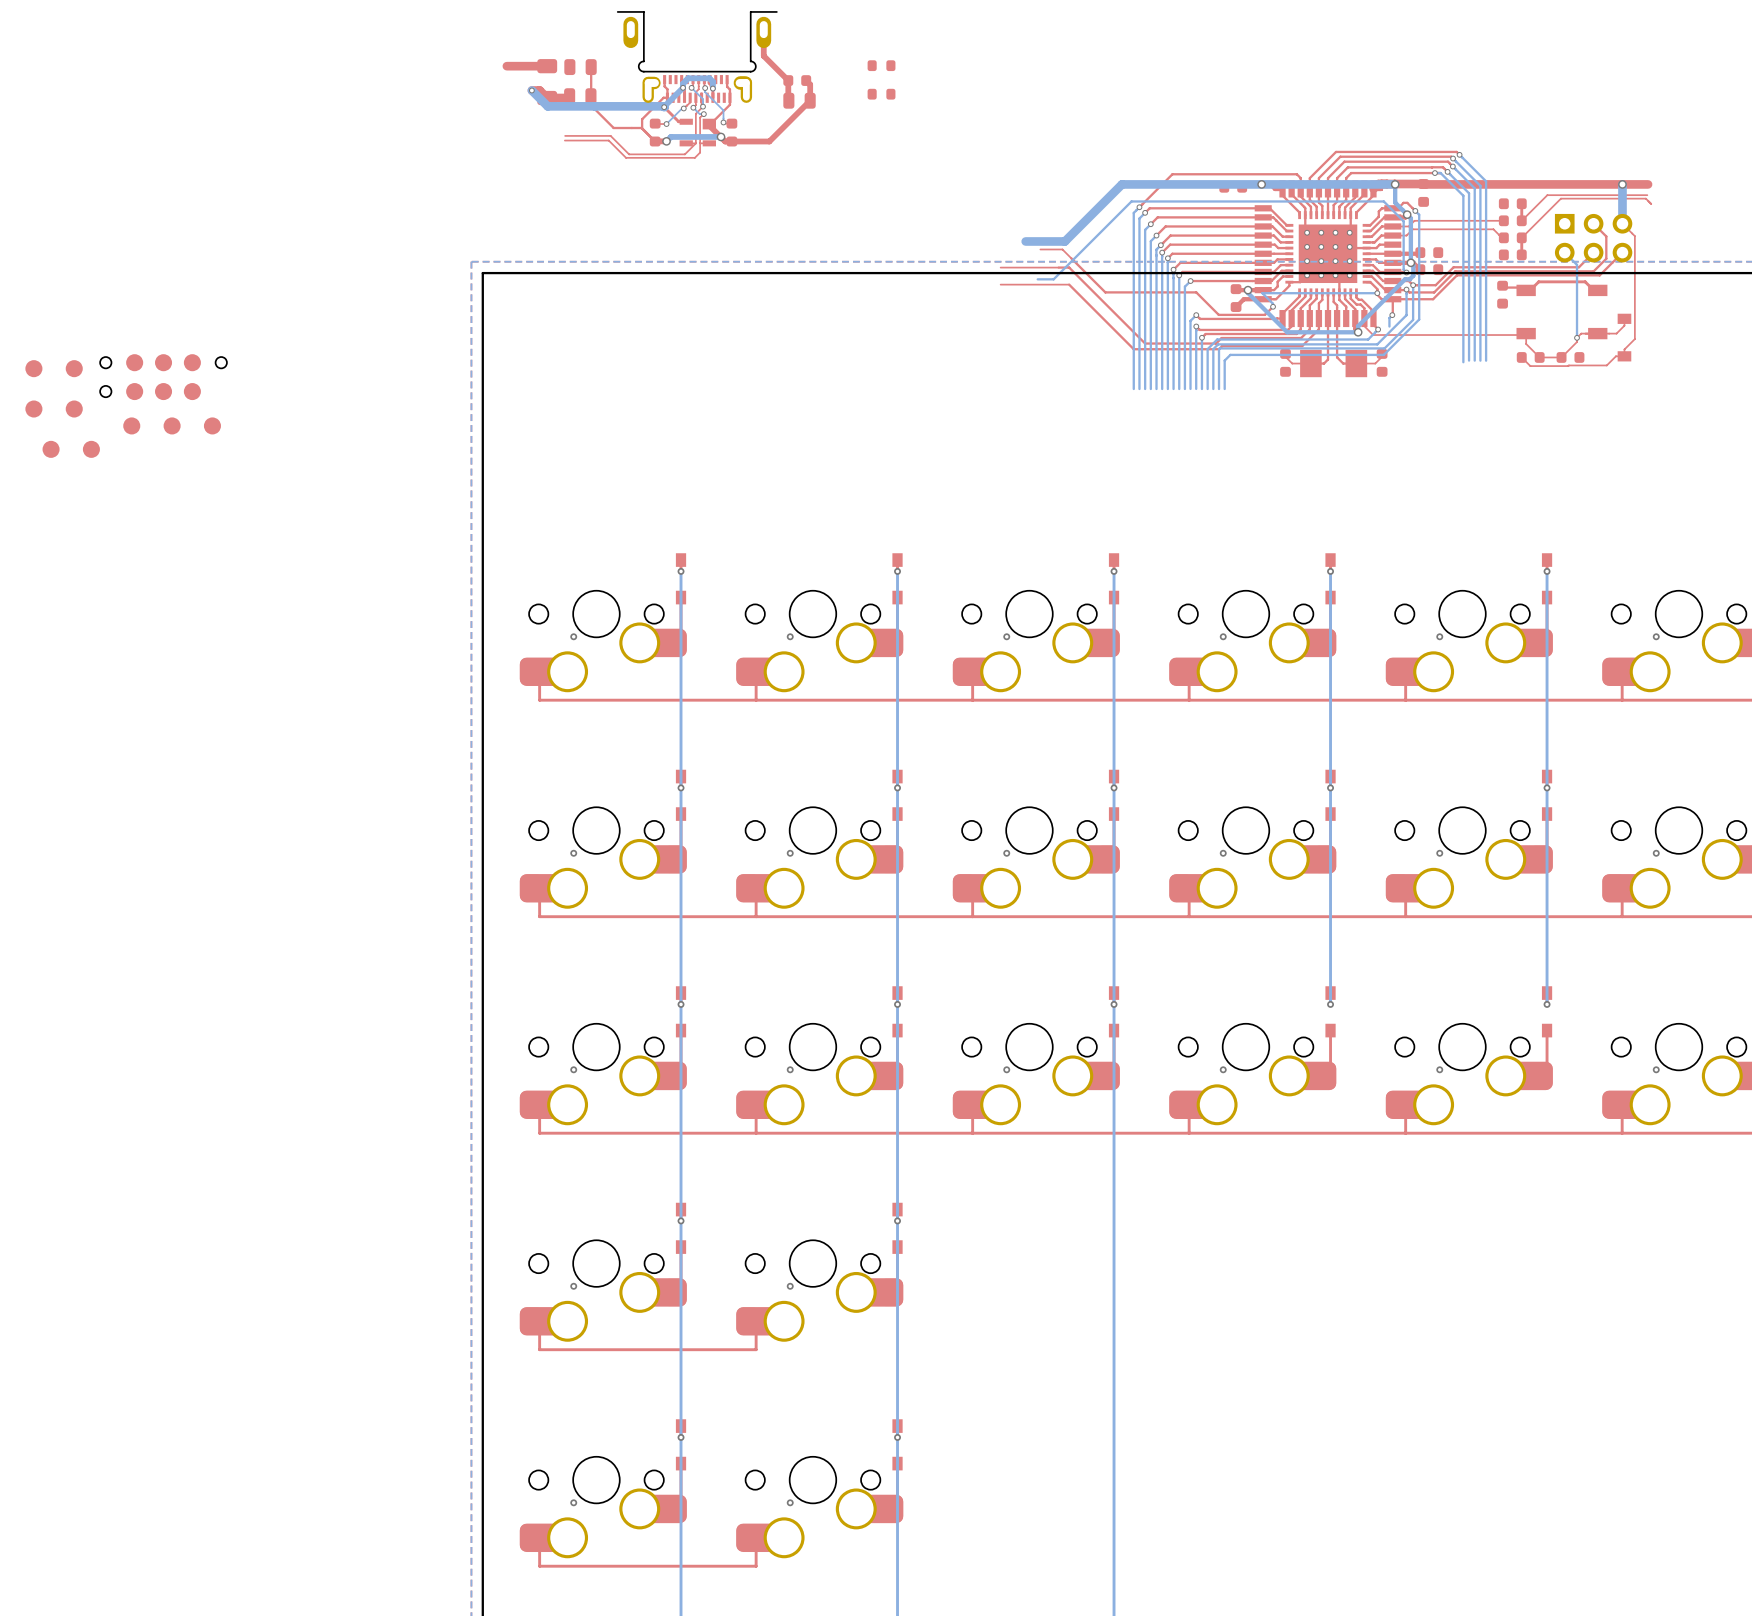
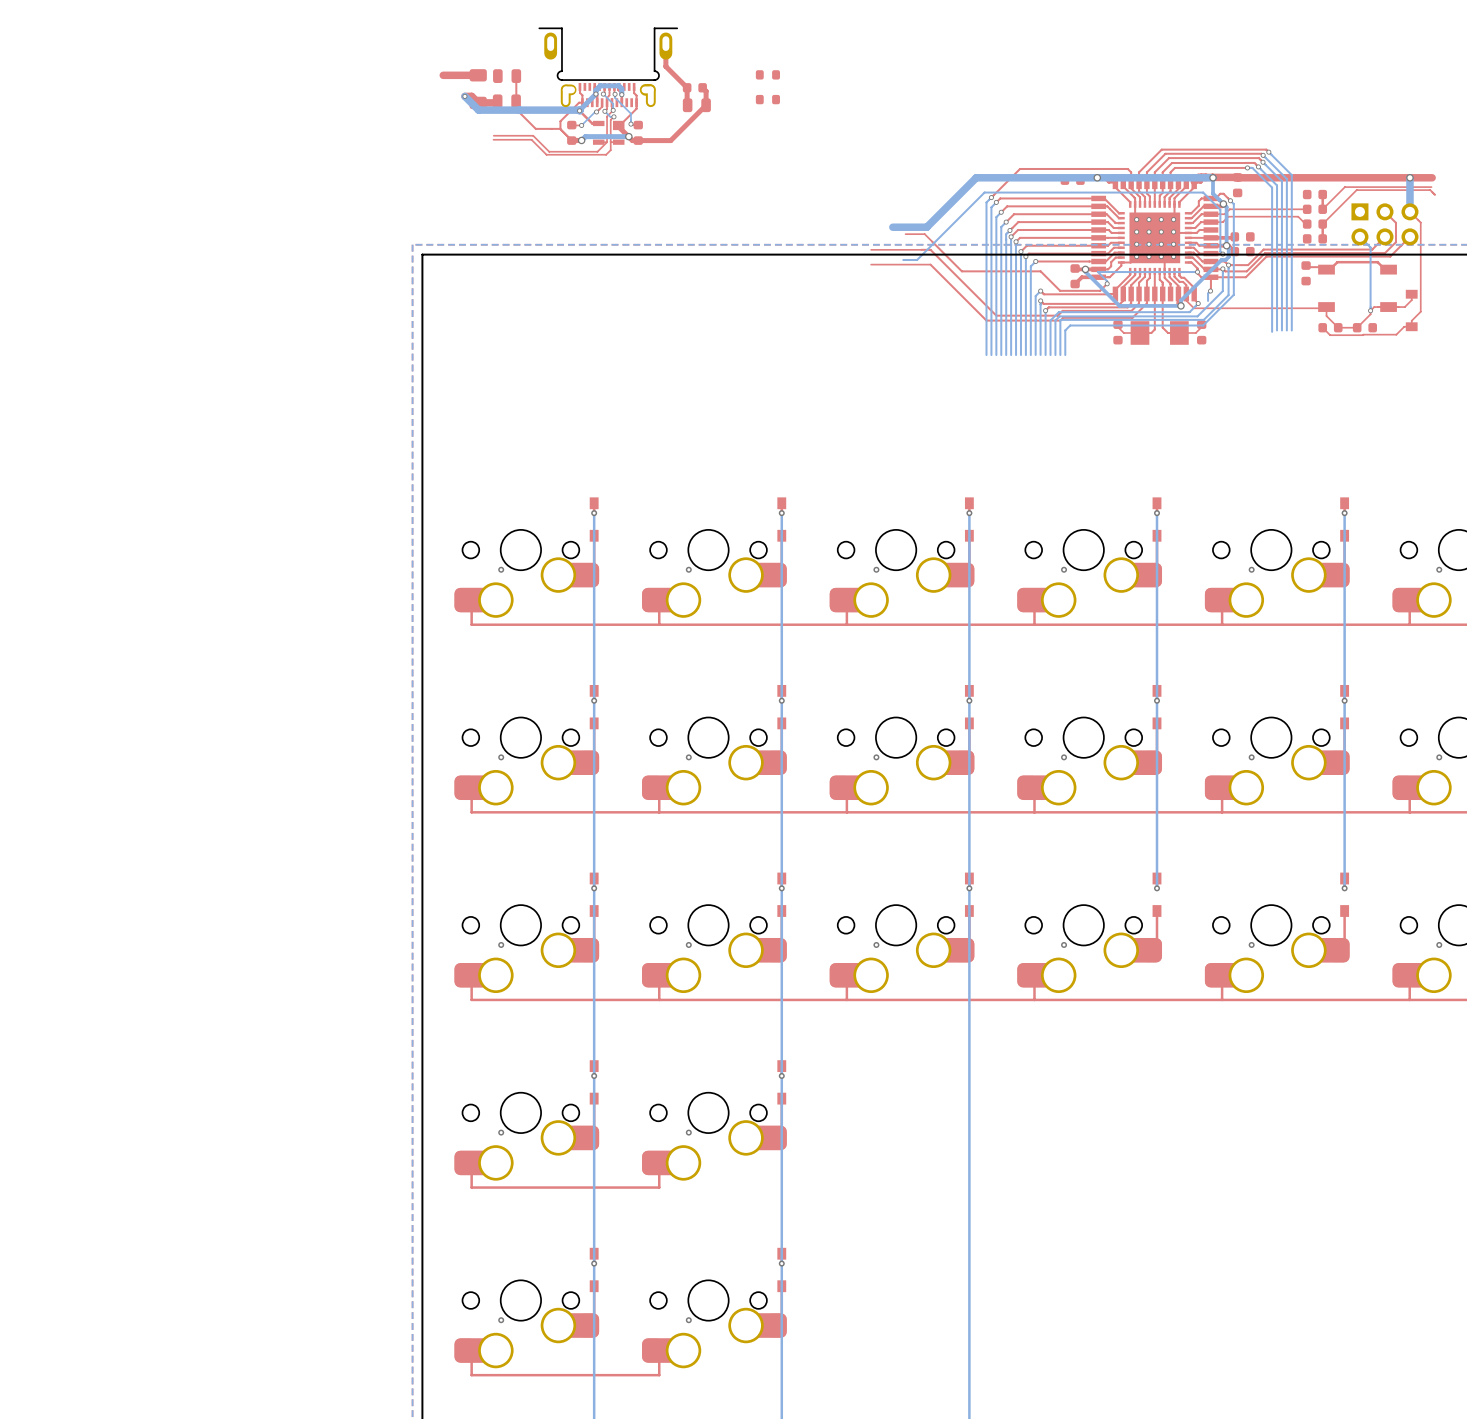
part: (33, 368) -> none
part: (74, 368) -> none
part: (163, 377) -> none
part: (33, 409) -> none
part: (74, 409) -> none
part: (131, 425) -> none
part: (172, 425) -> none
part: (212, 425) -> none
part: (51, 449) -> none
part: (91, 449) -> none

